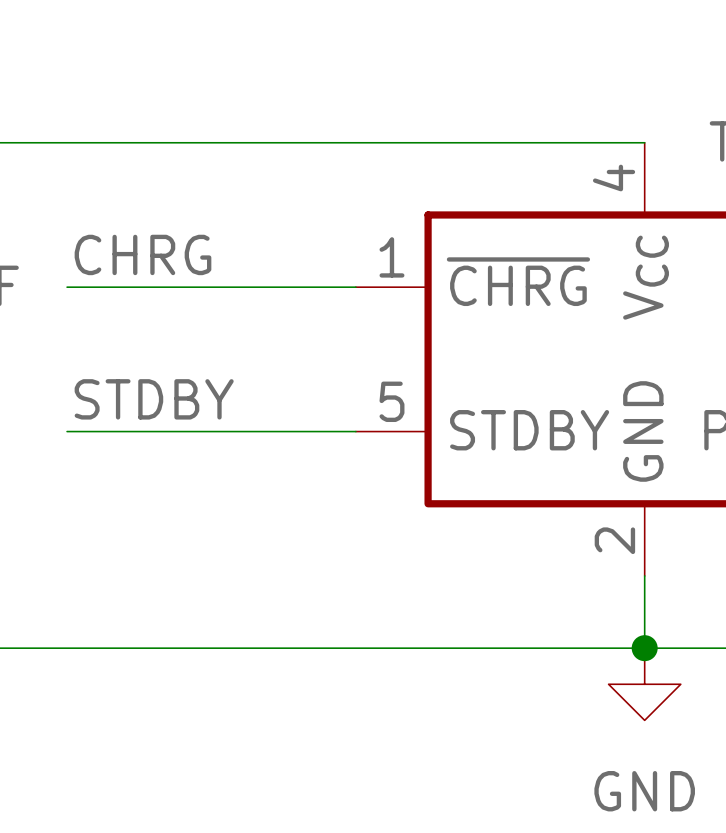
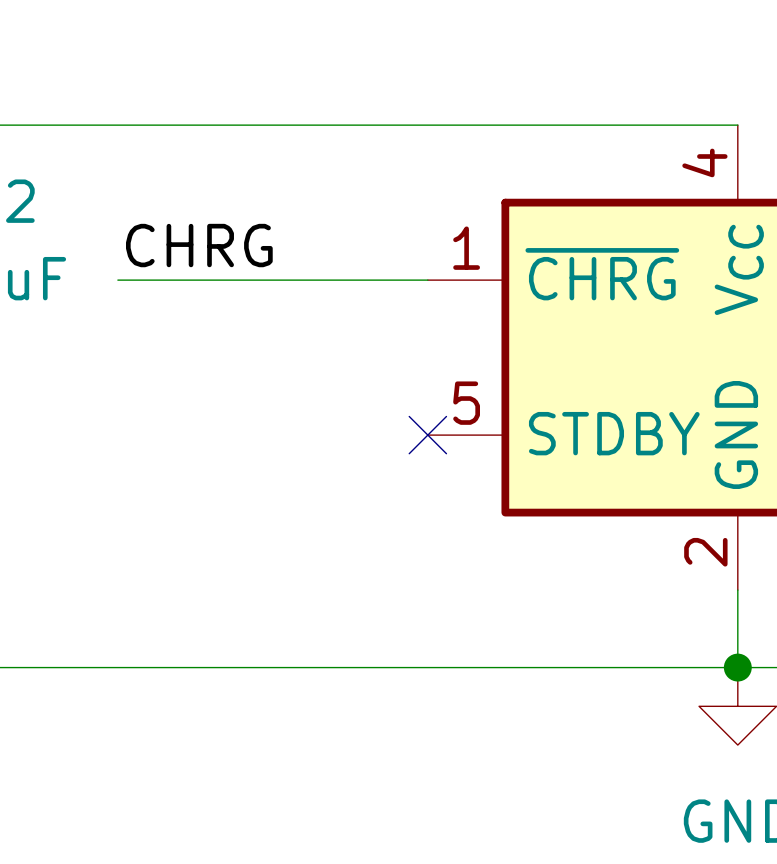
label: STDBY (154, 399) -> none
wire: (67, 431) (355, 431) -> none
no-connect mark: none -> (427, 435)

